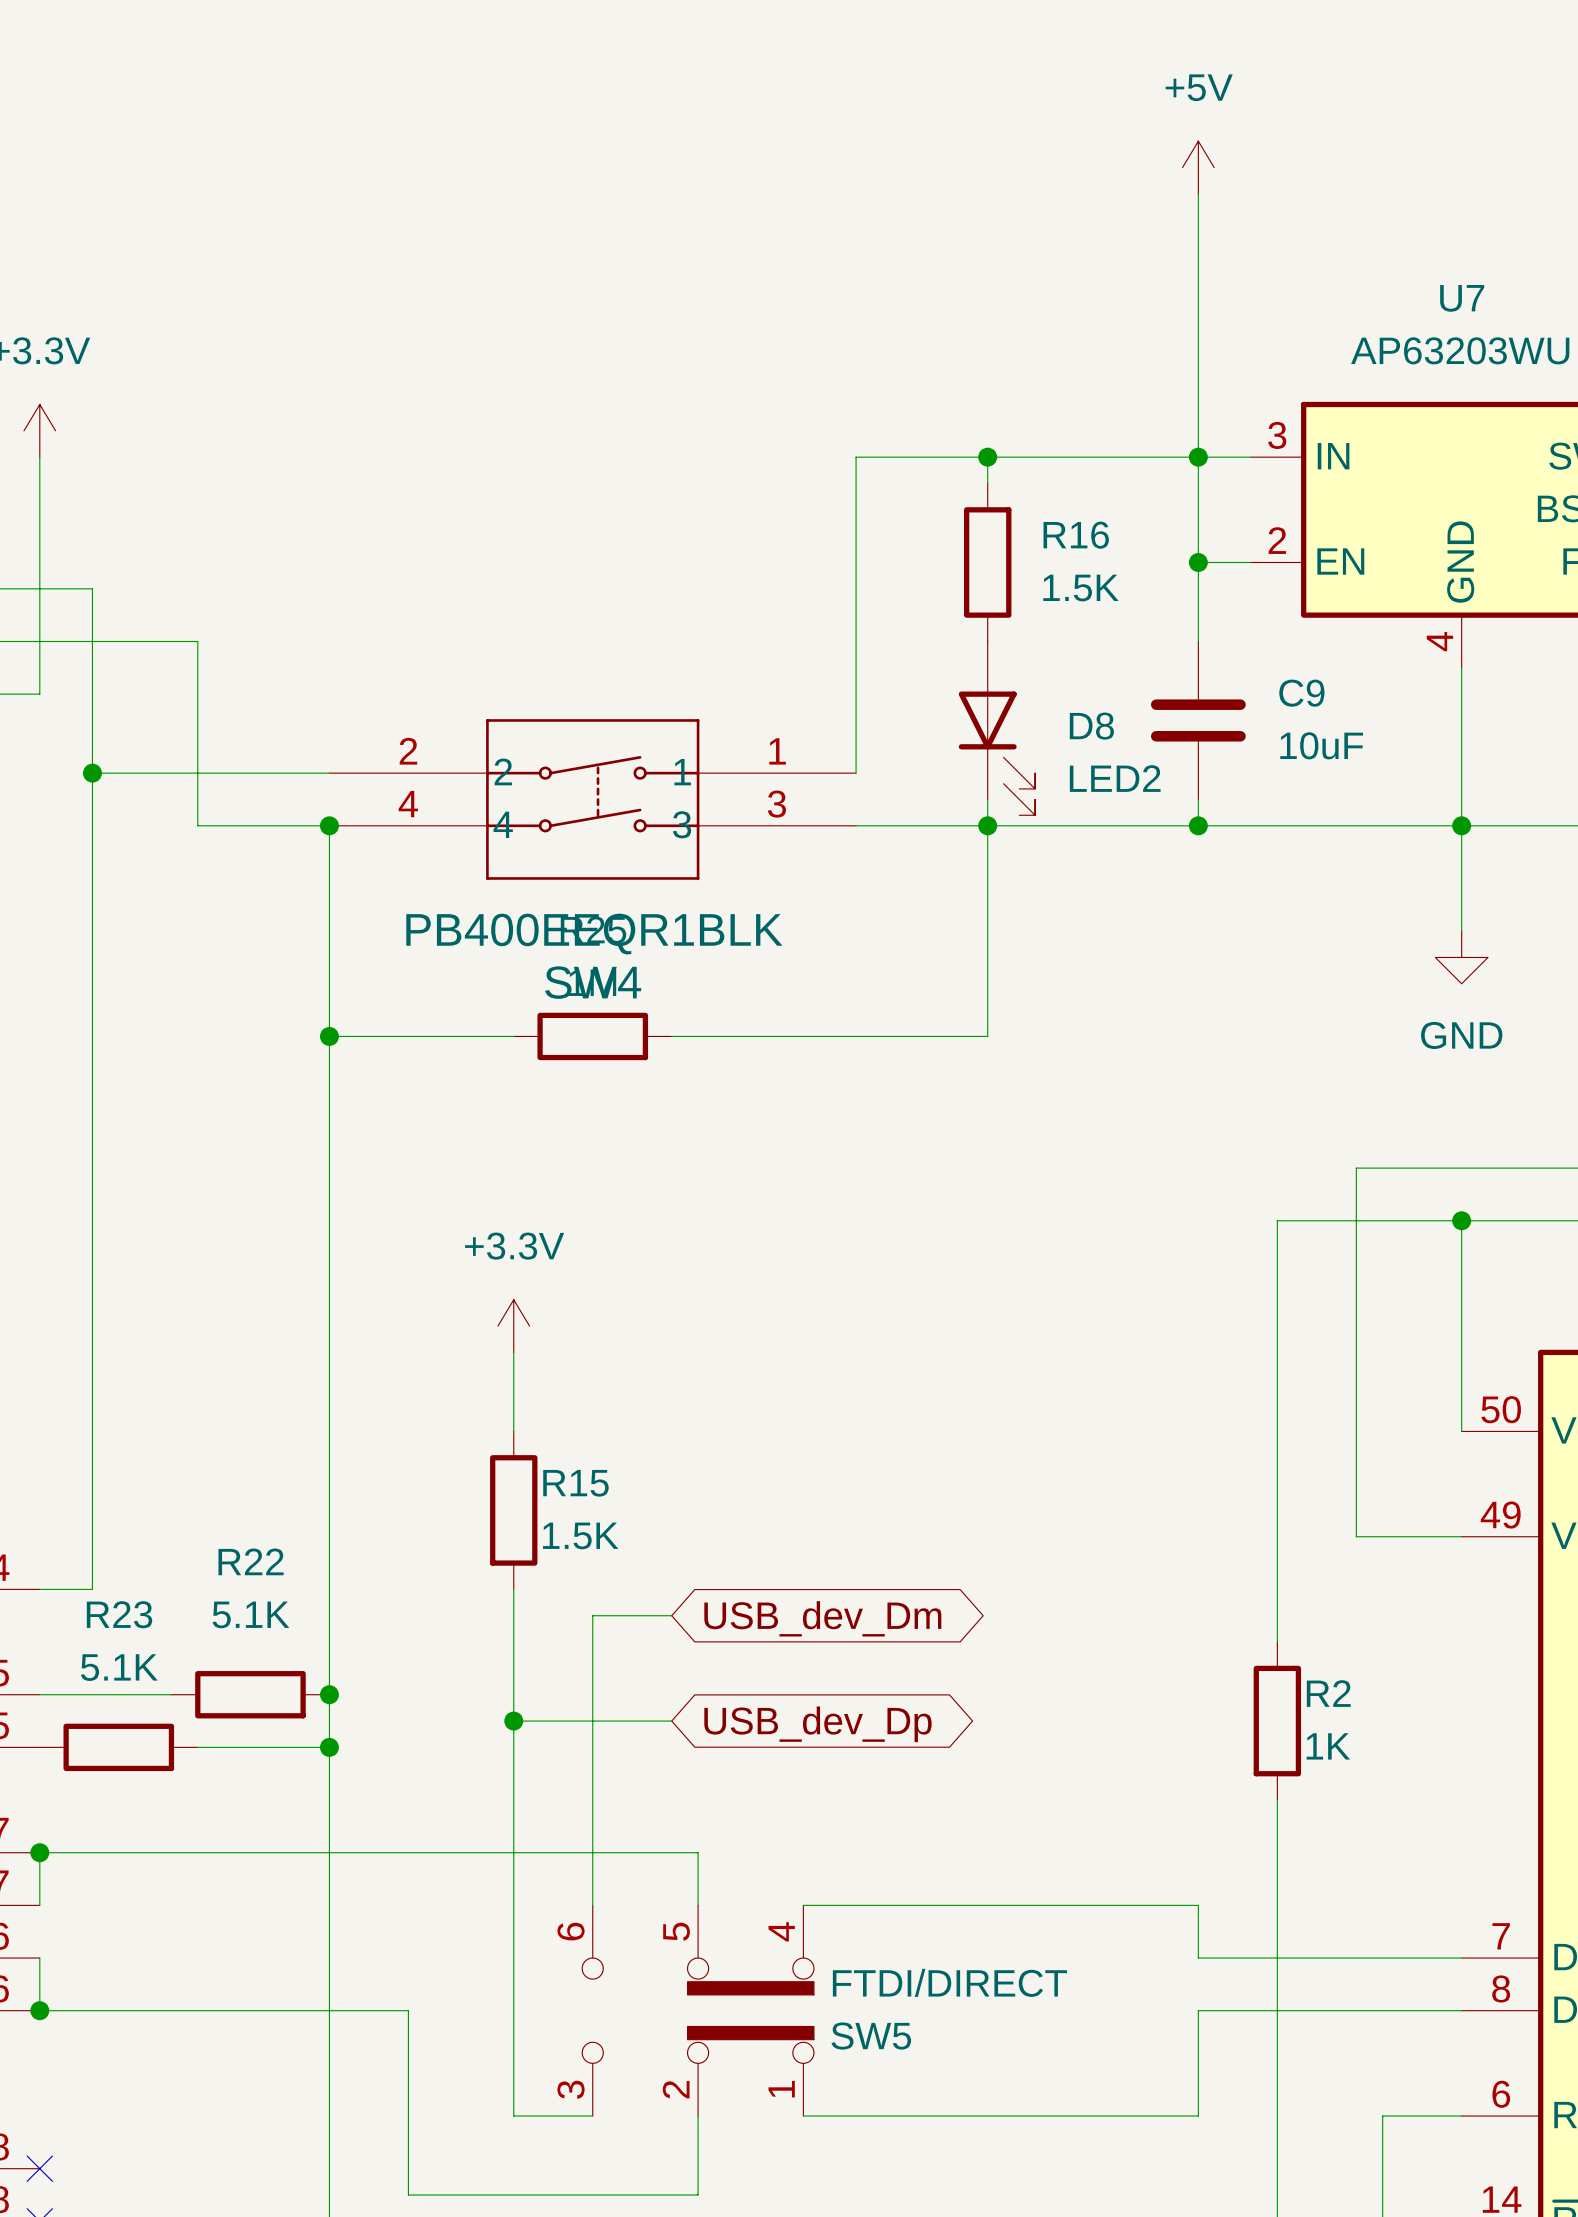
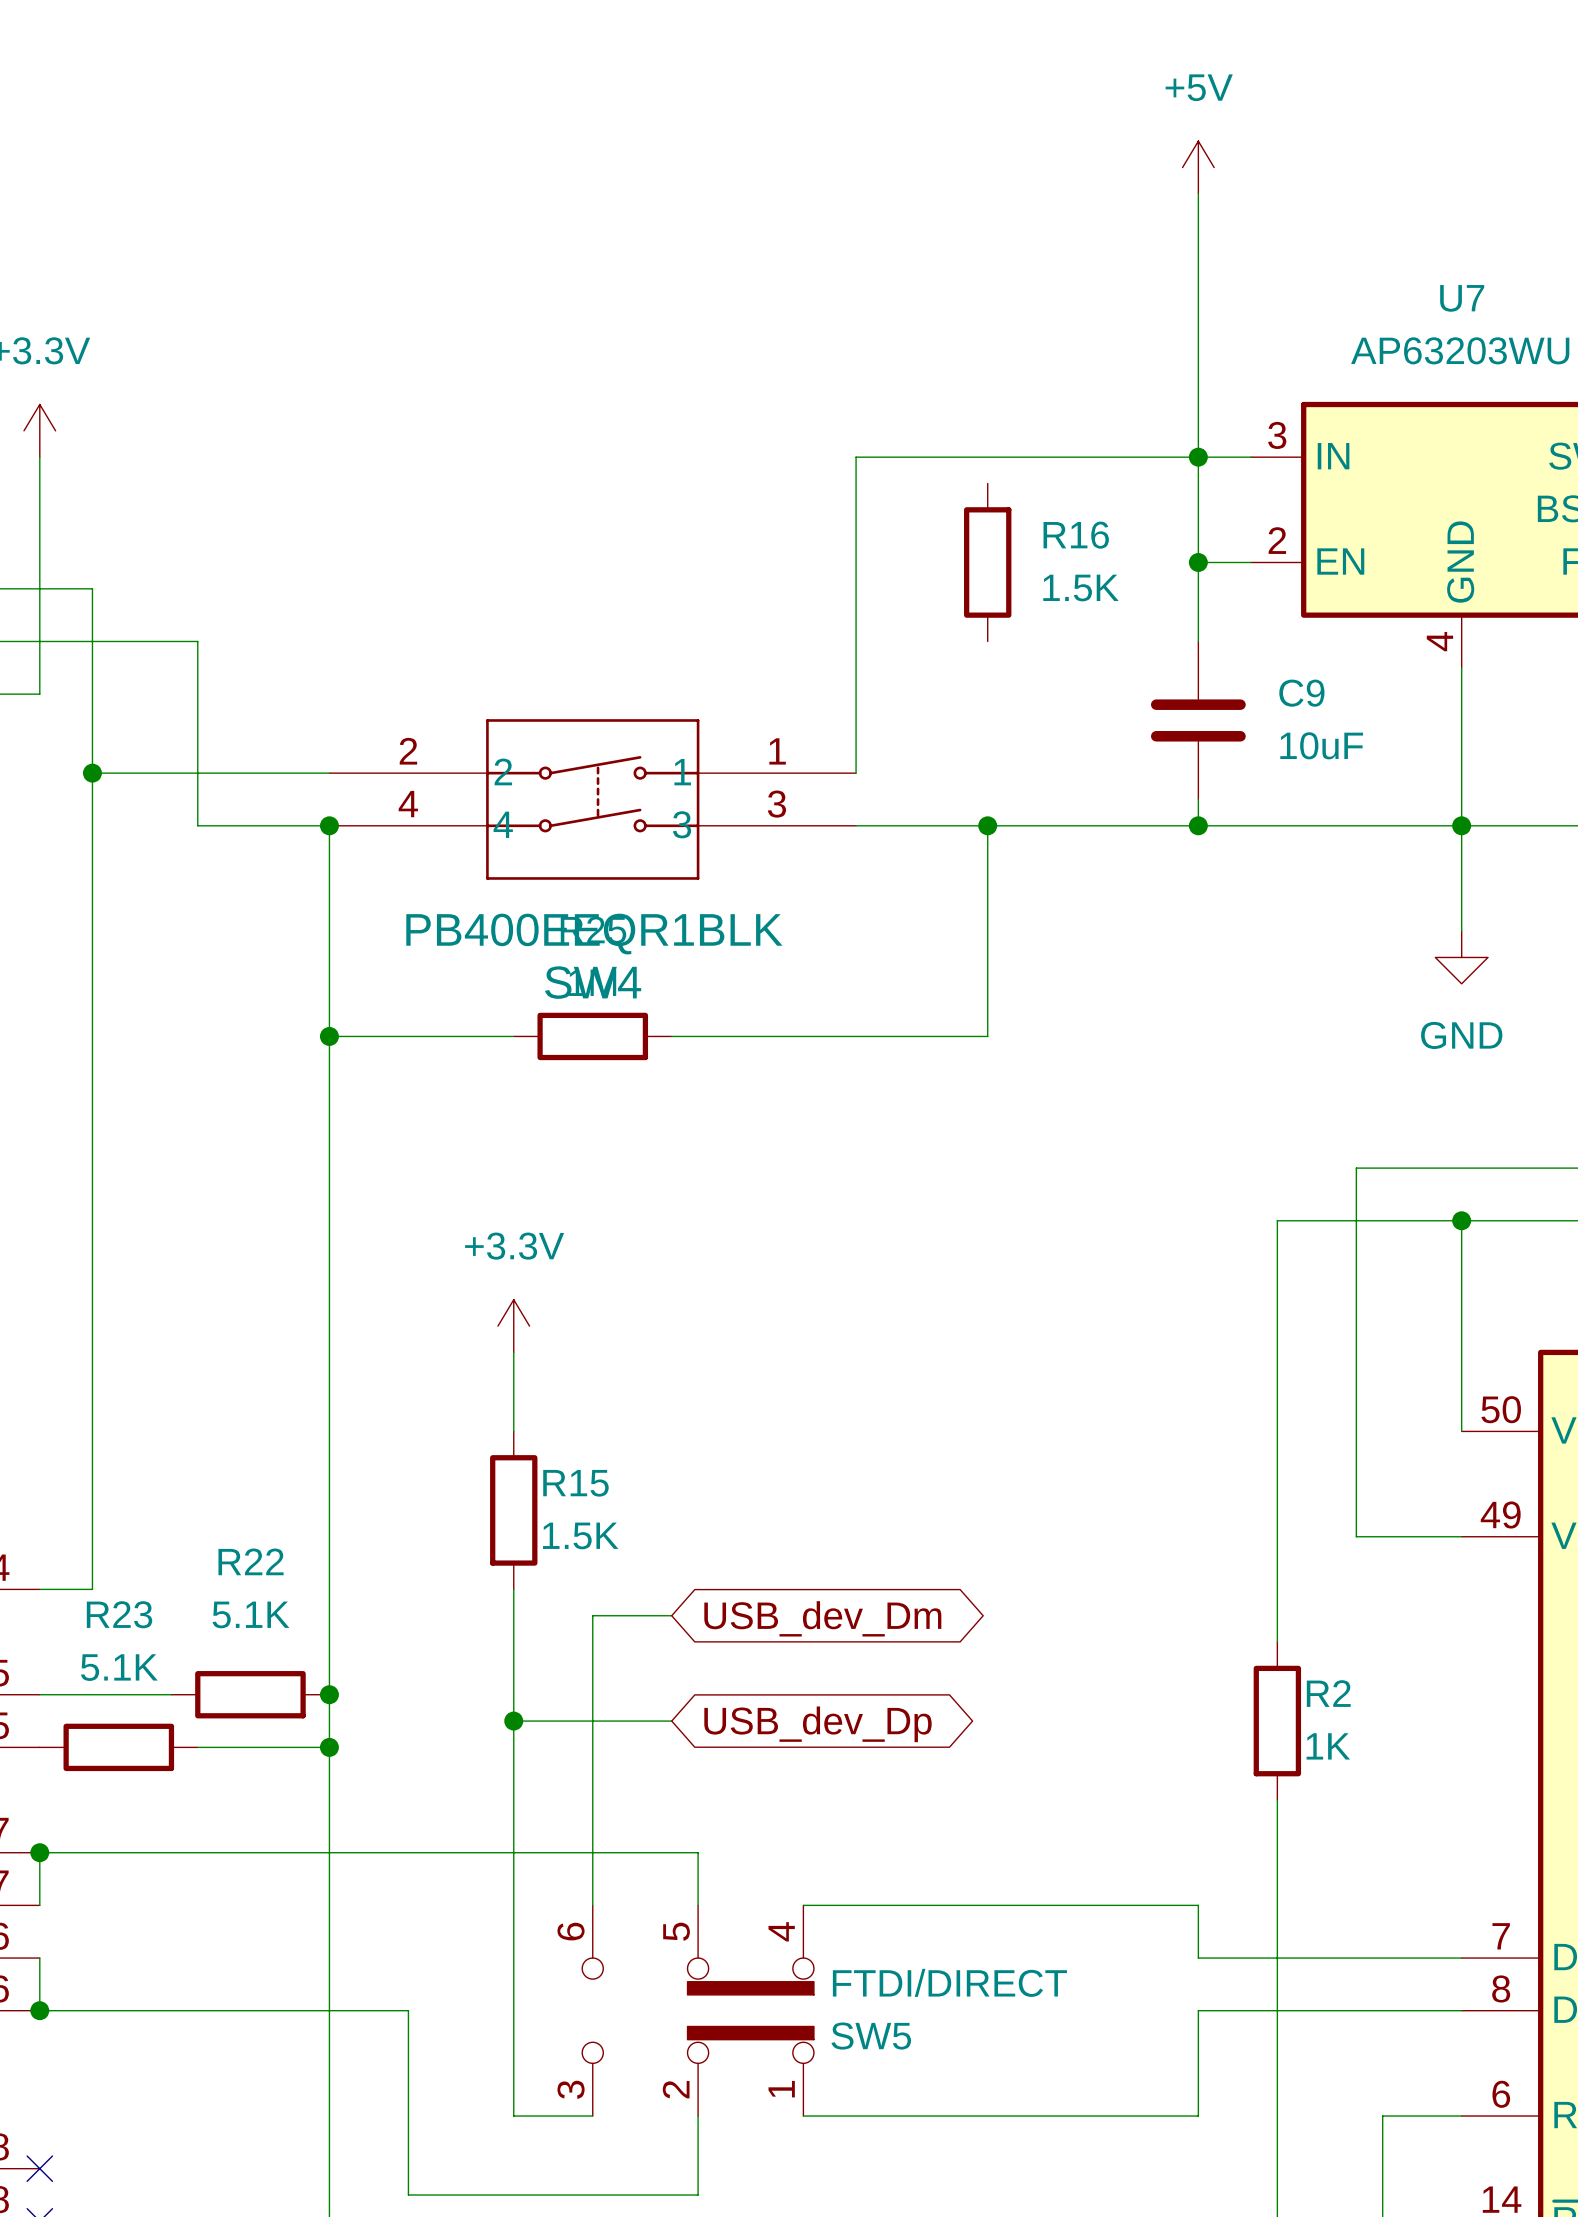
wire: (987, 457) (987, 483) -> none
junction: (987, 457) -> none
D8: LED2 (996, 728) -> none
wire: (987, 799) (987, 825) -> none

